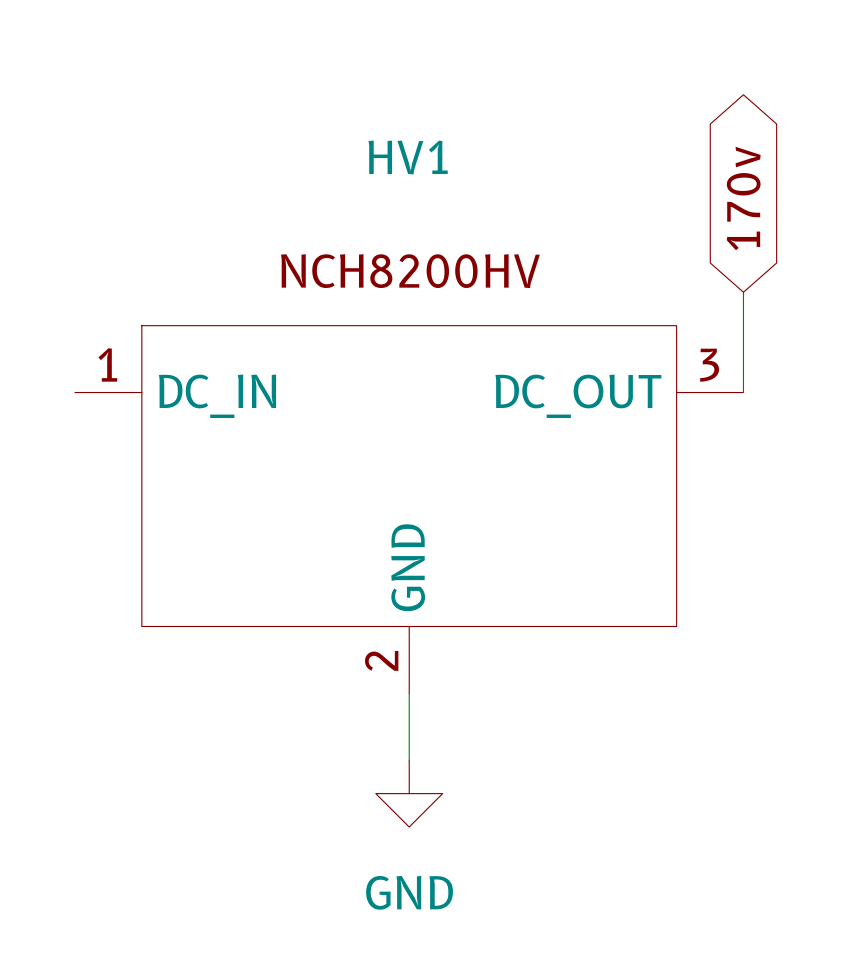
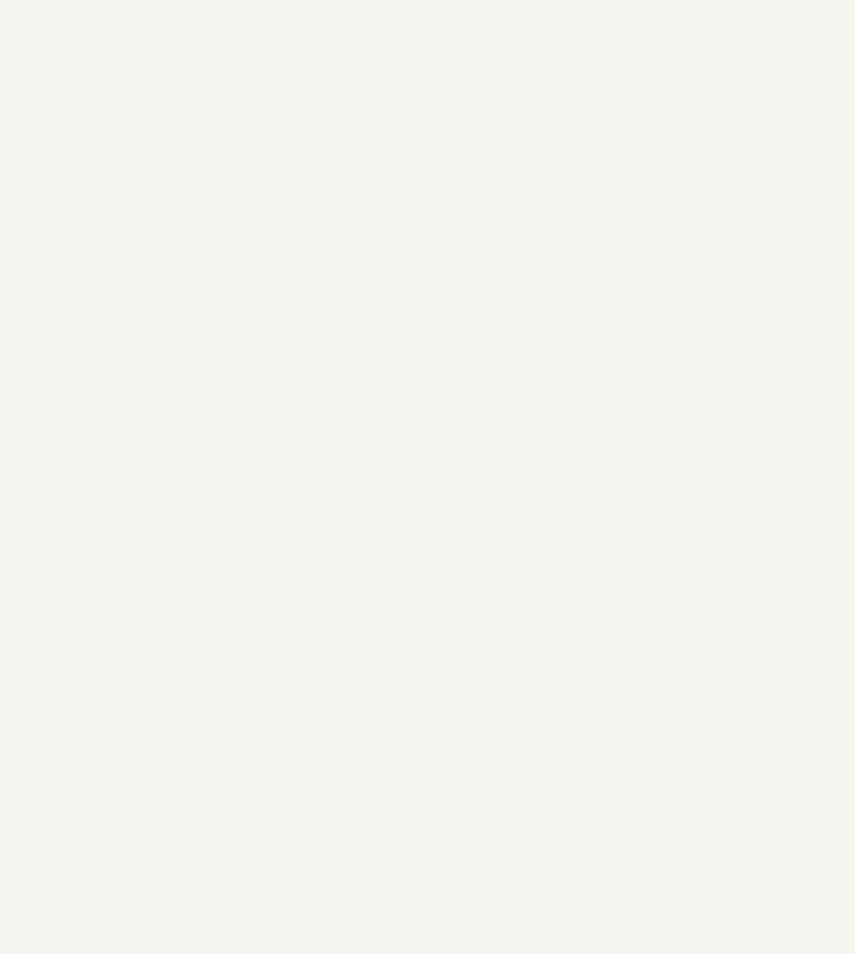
global label: 170v (743, 198) -> none
wire: (743, 292) (743, 392) -> none
HV1: (409, 509) -> none
wire: (409, 693) (409, 760) -> none
power symbol: GND (409, 793) -> none

